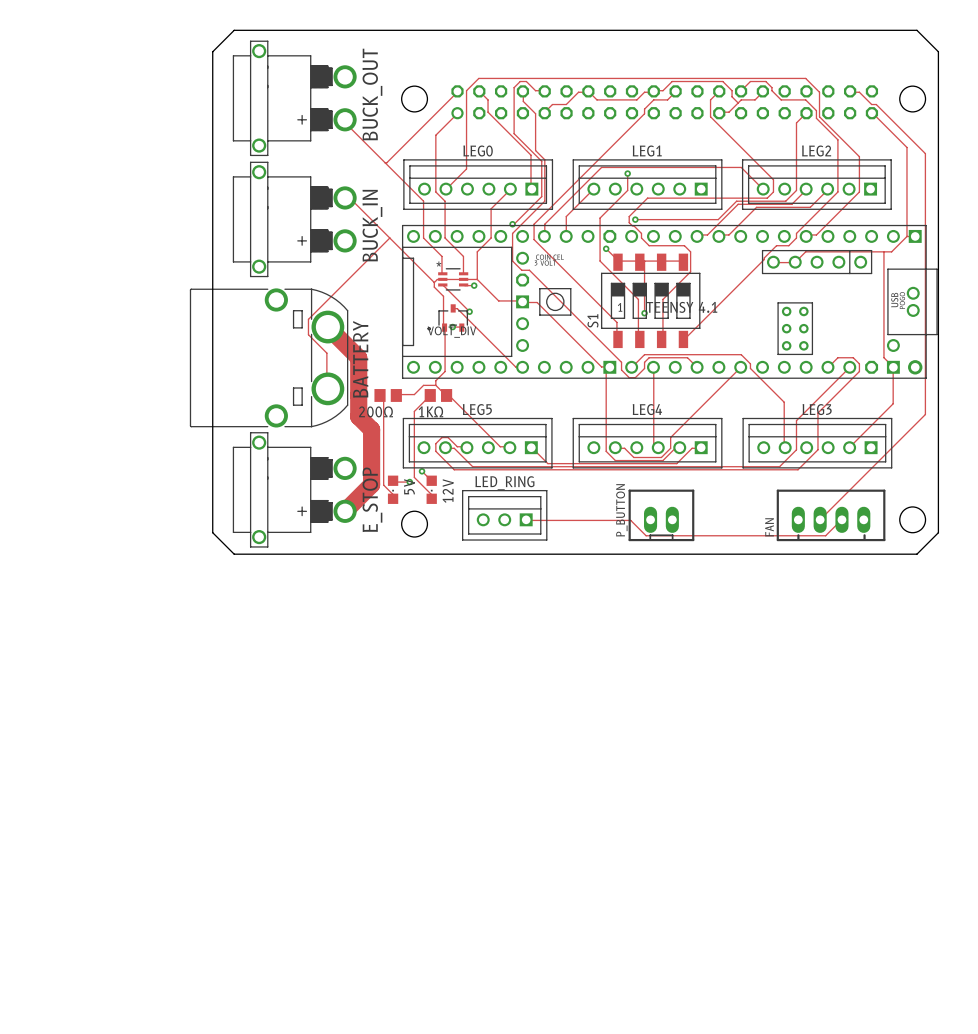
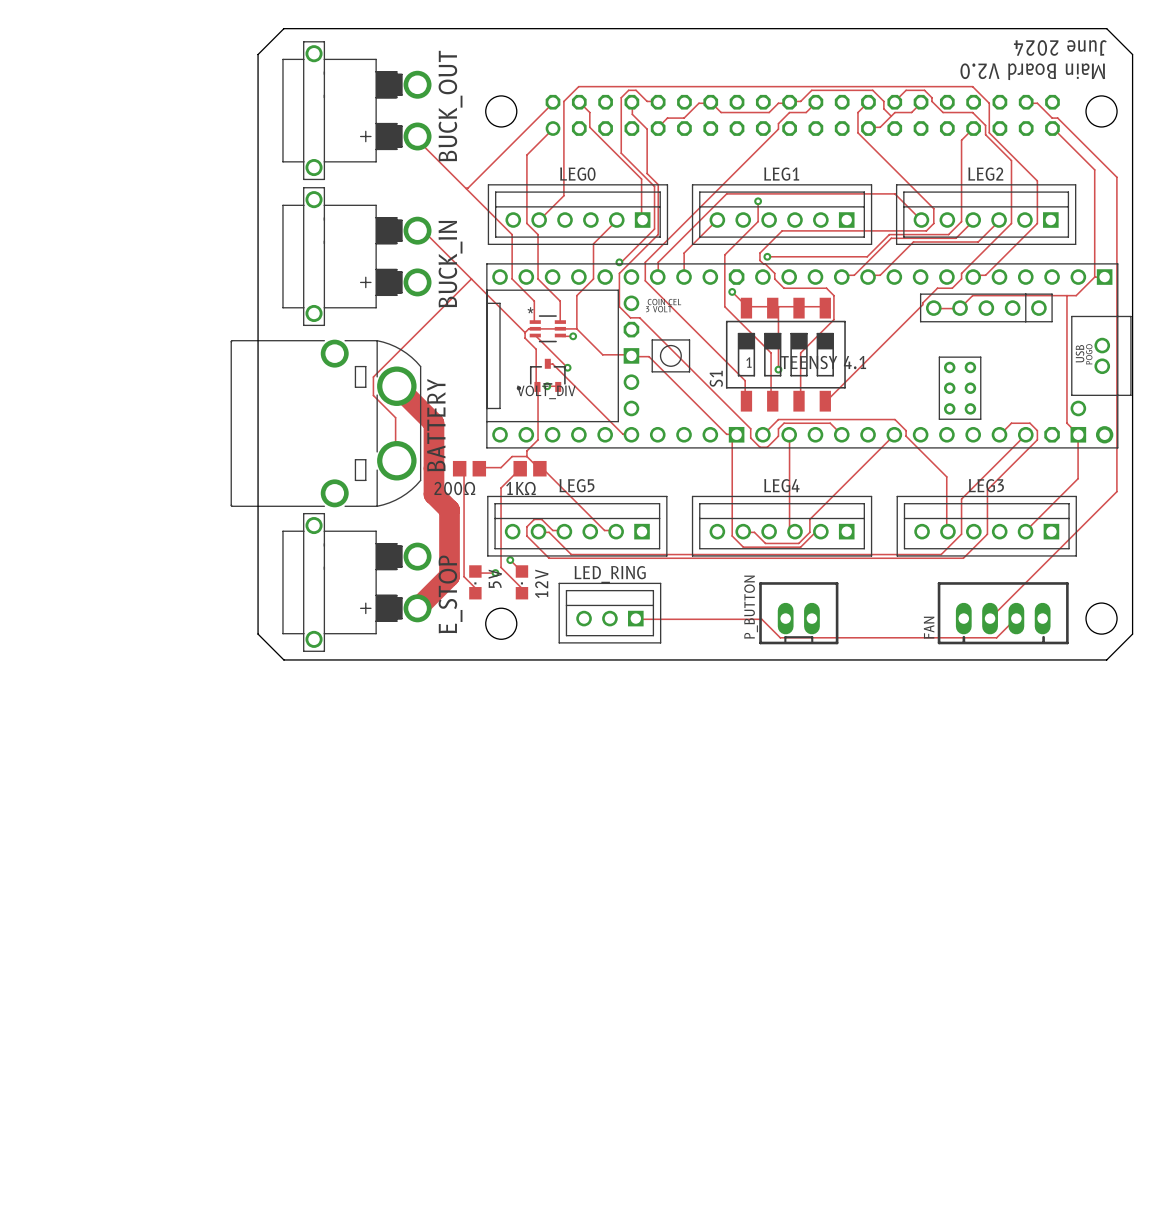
text: none -> June 2024 (1060, 47)
text: none -> Main Board V2.0 (1032, 71)
track: (531, 447) (547, 463) (676, 463) (692, 448) (701, 447) -> none

